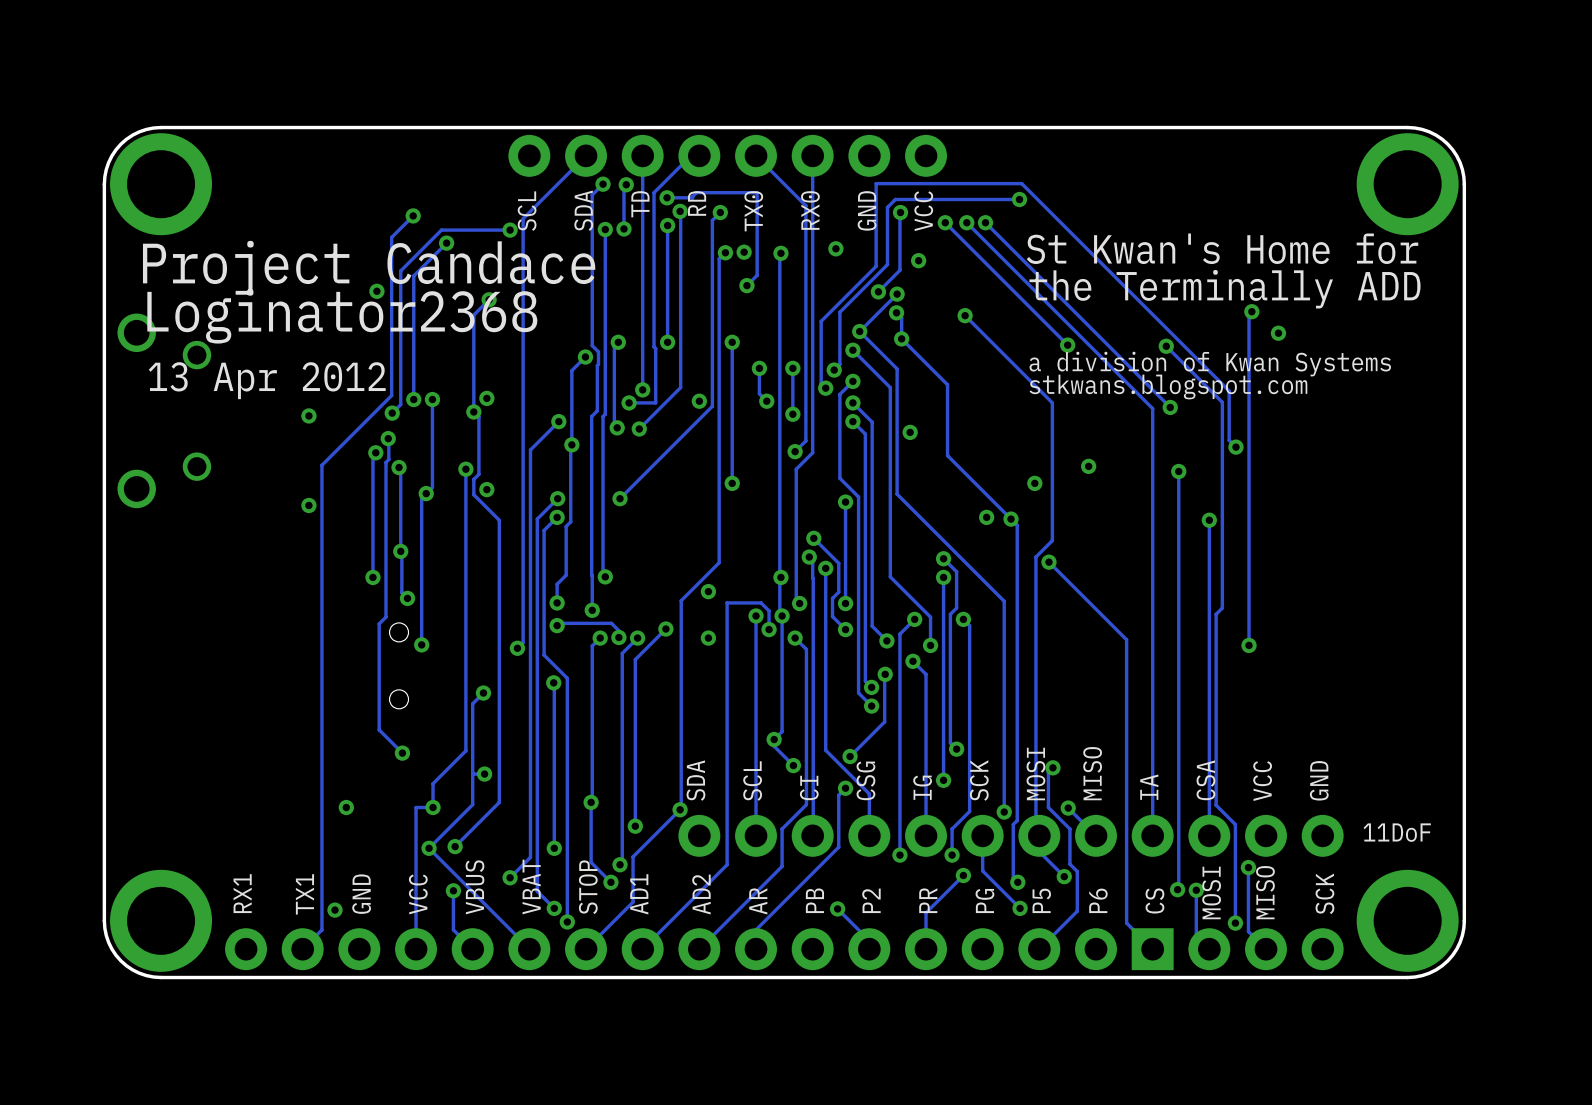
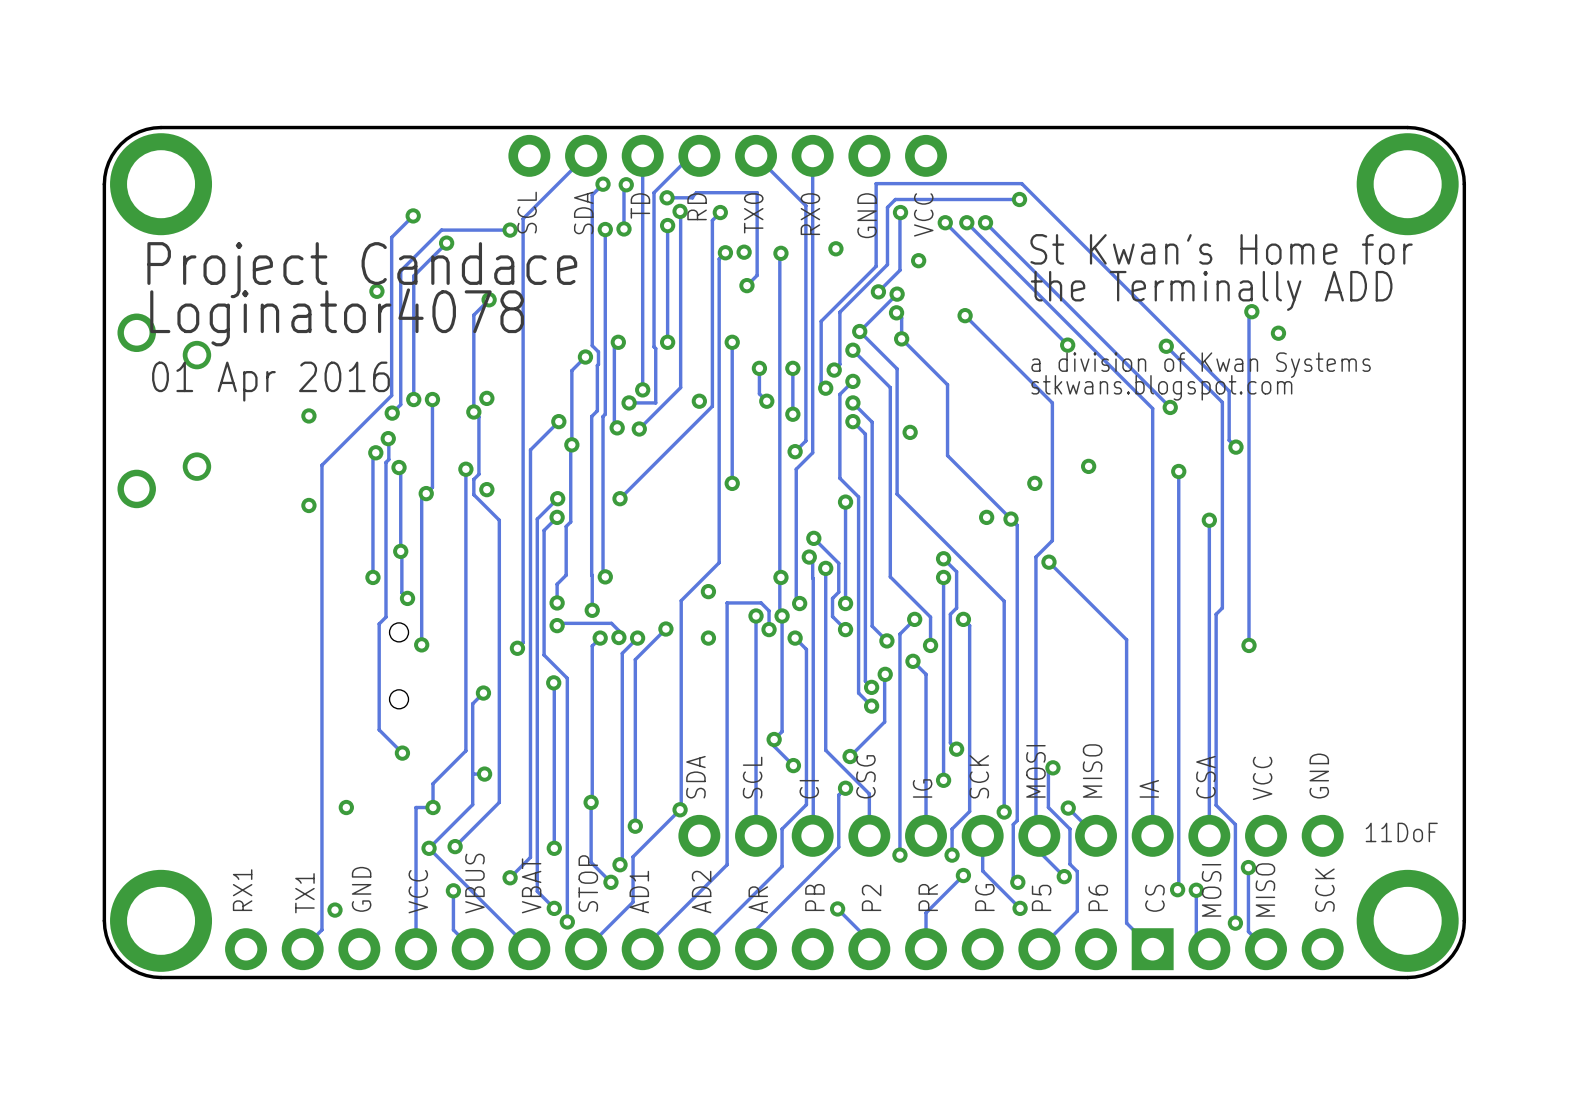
text: Loginator2368 (342, 316) -> Loginator4078 (337, 317)
text: 13 Apr 2012 (267, 380) -> 01 Apr 2016 (270, 381)

